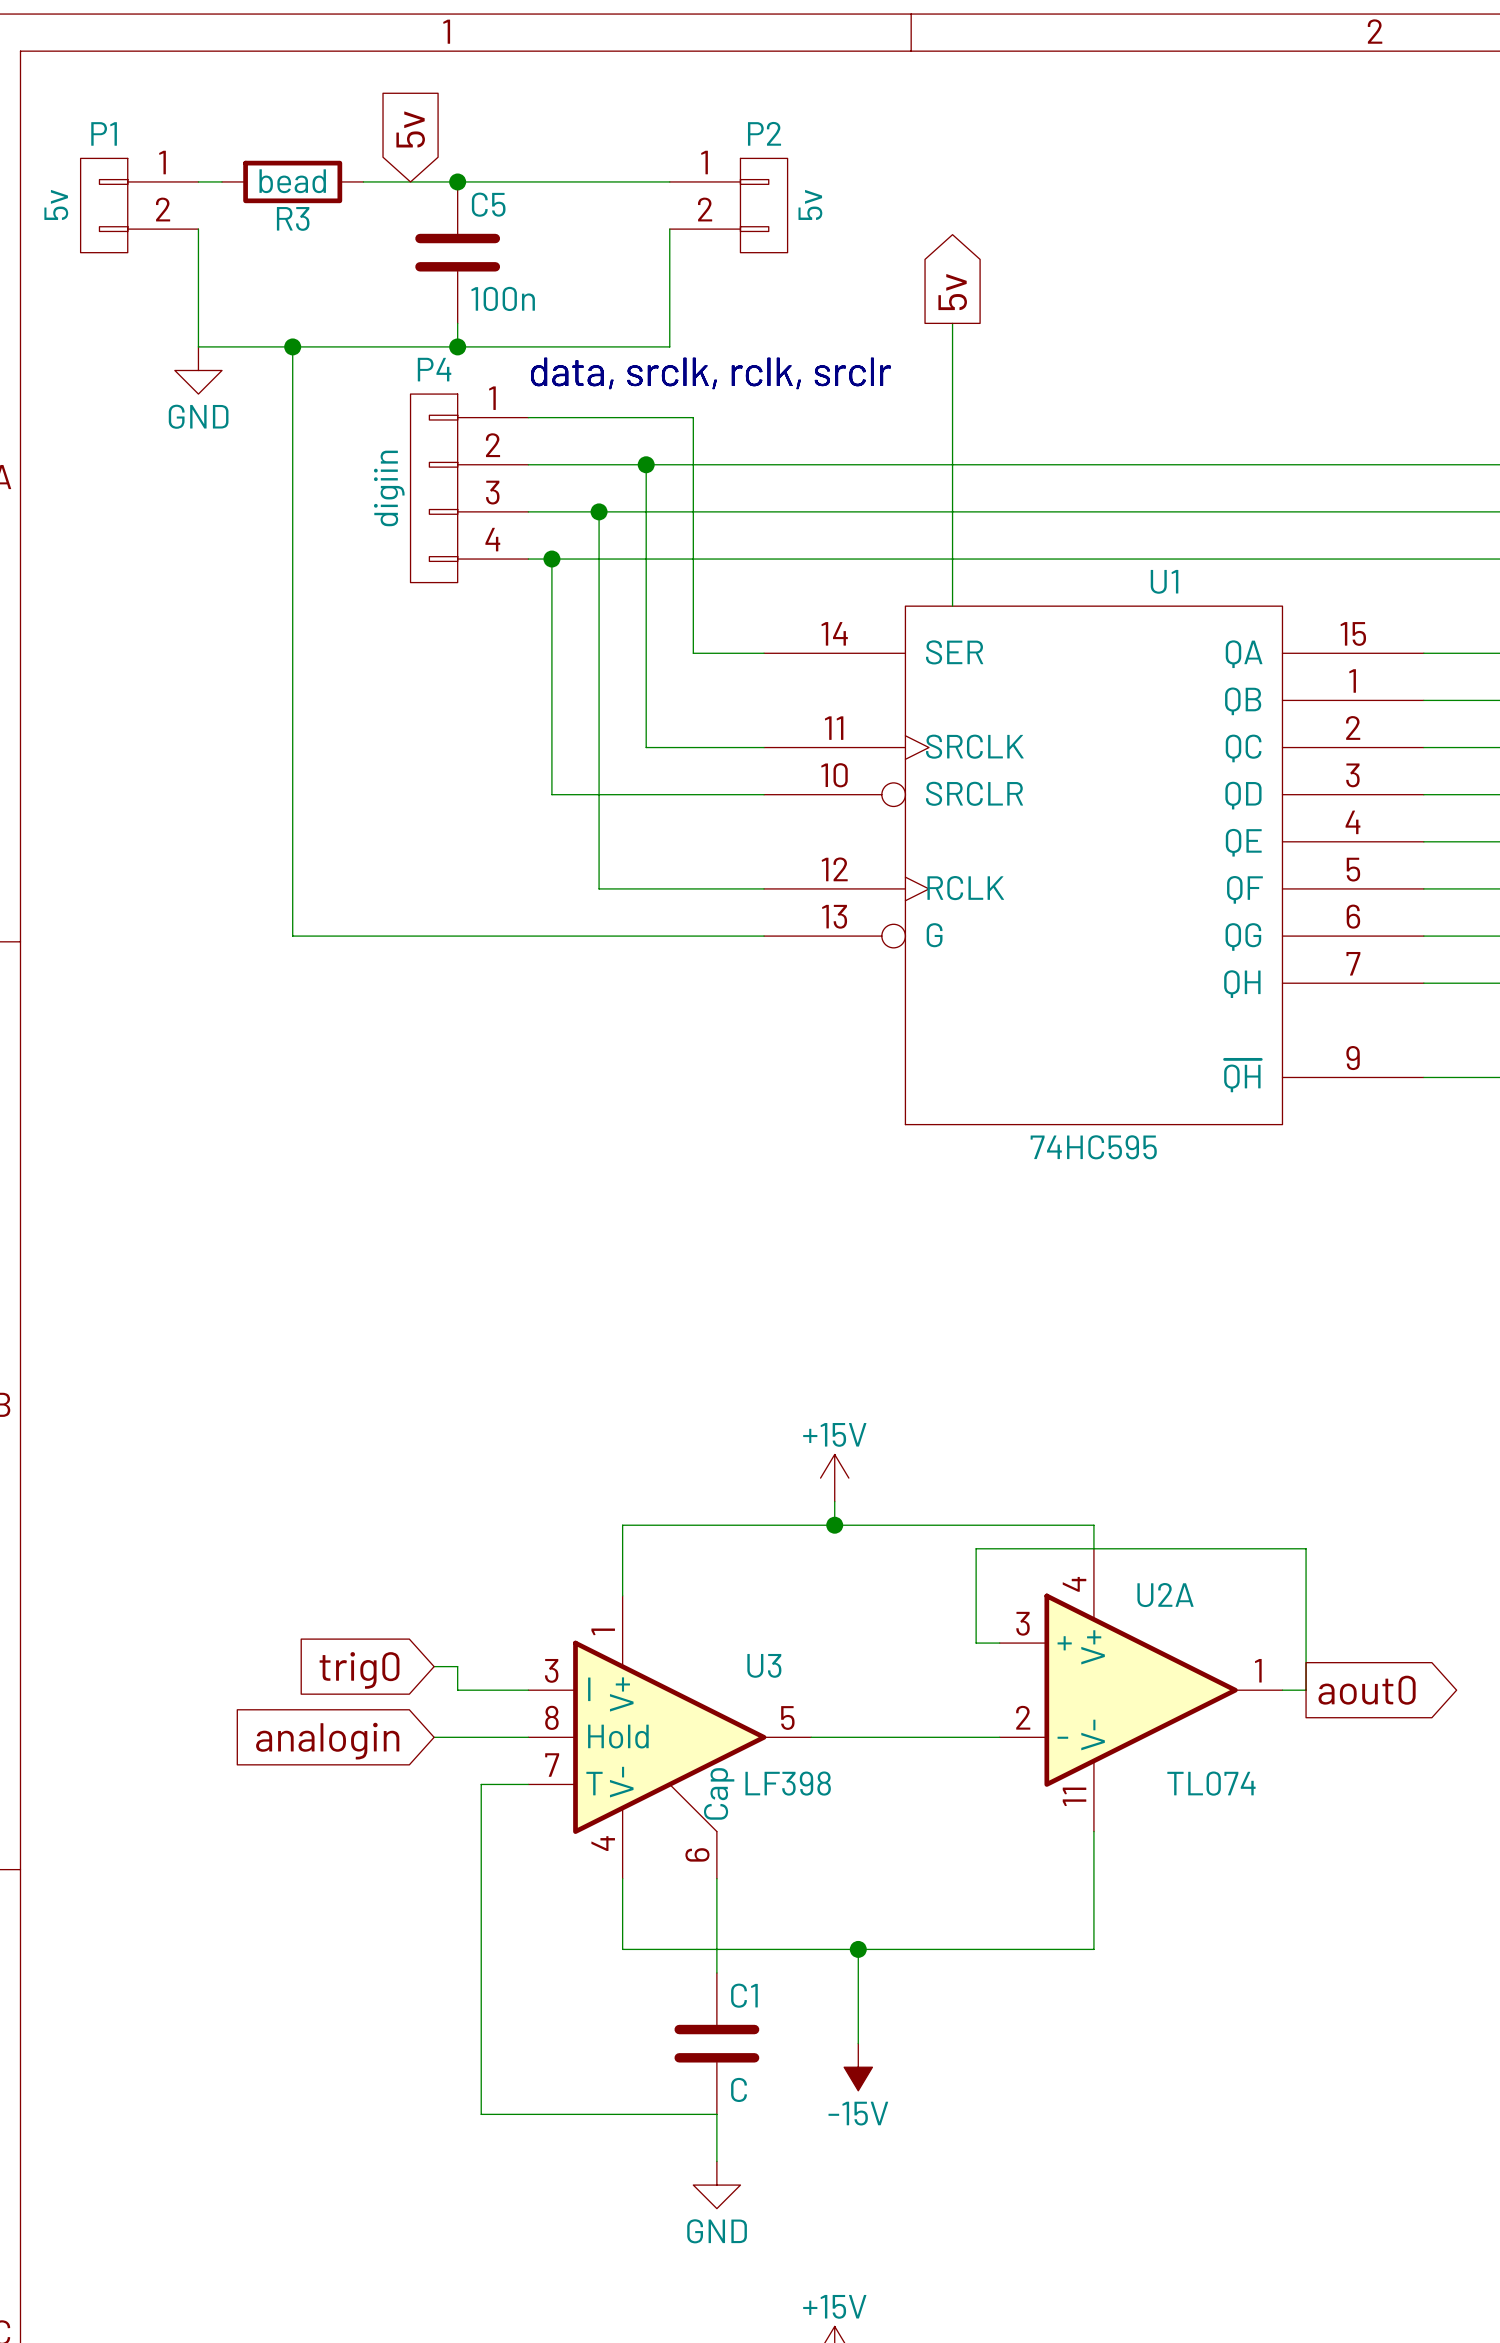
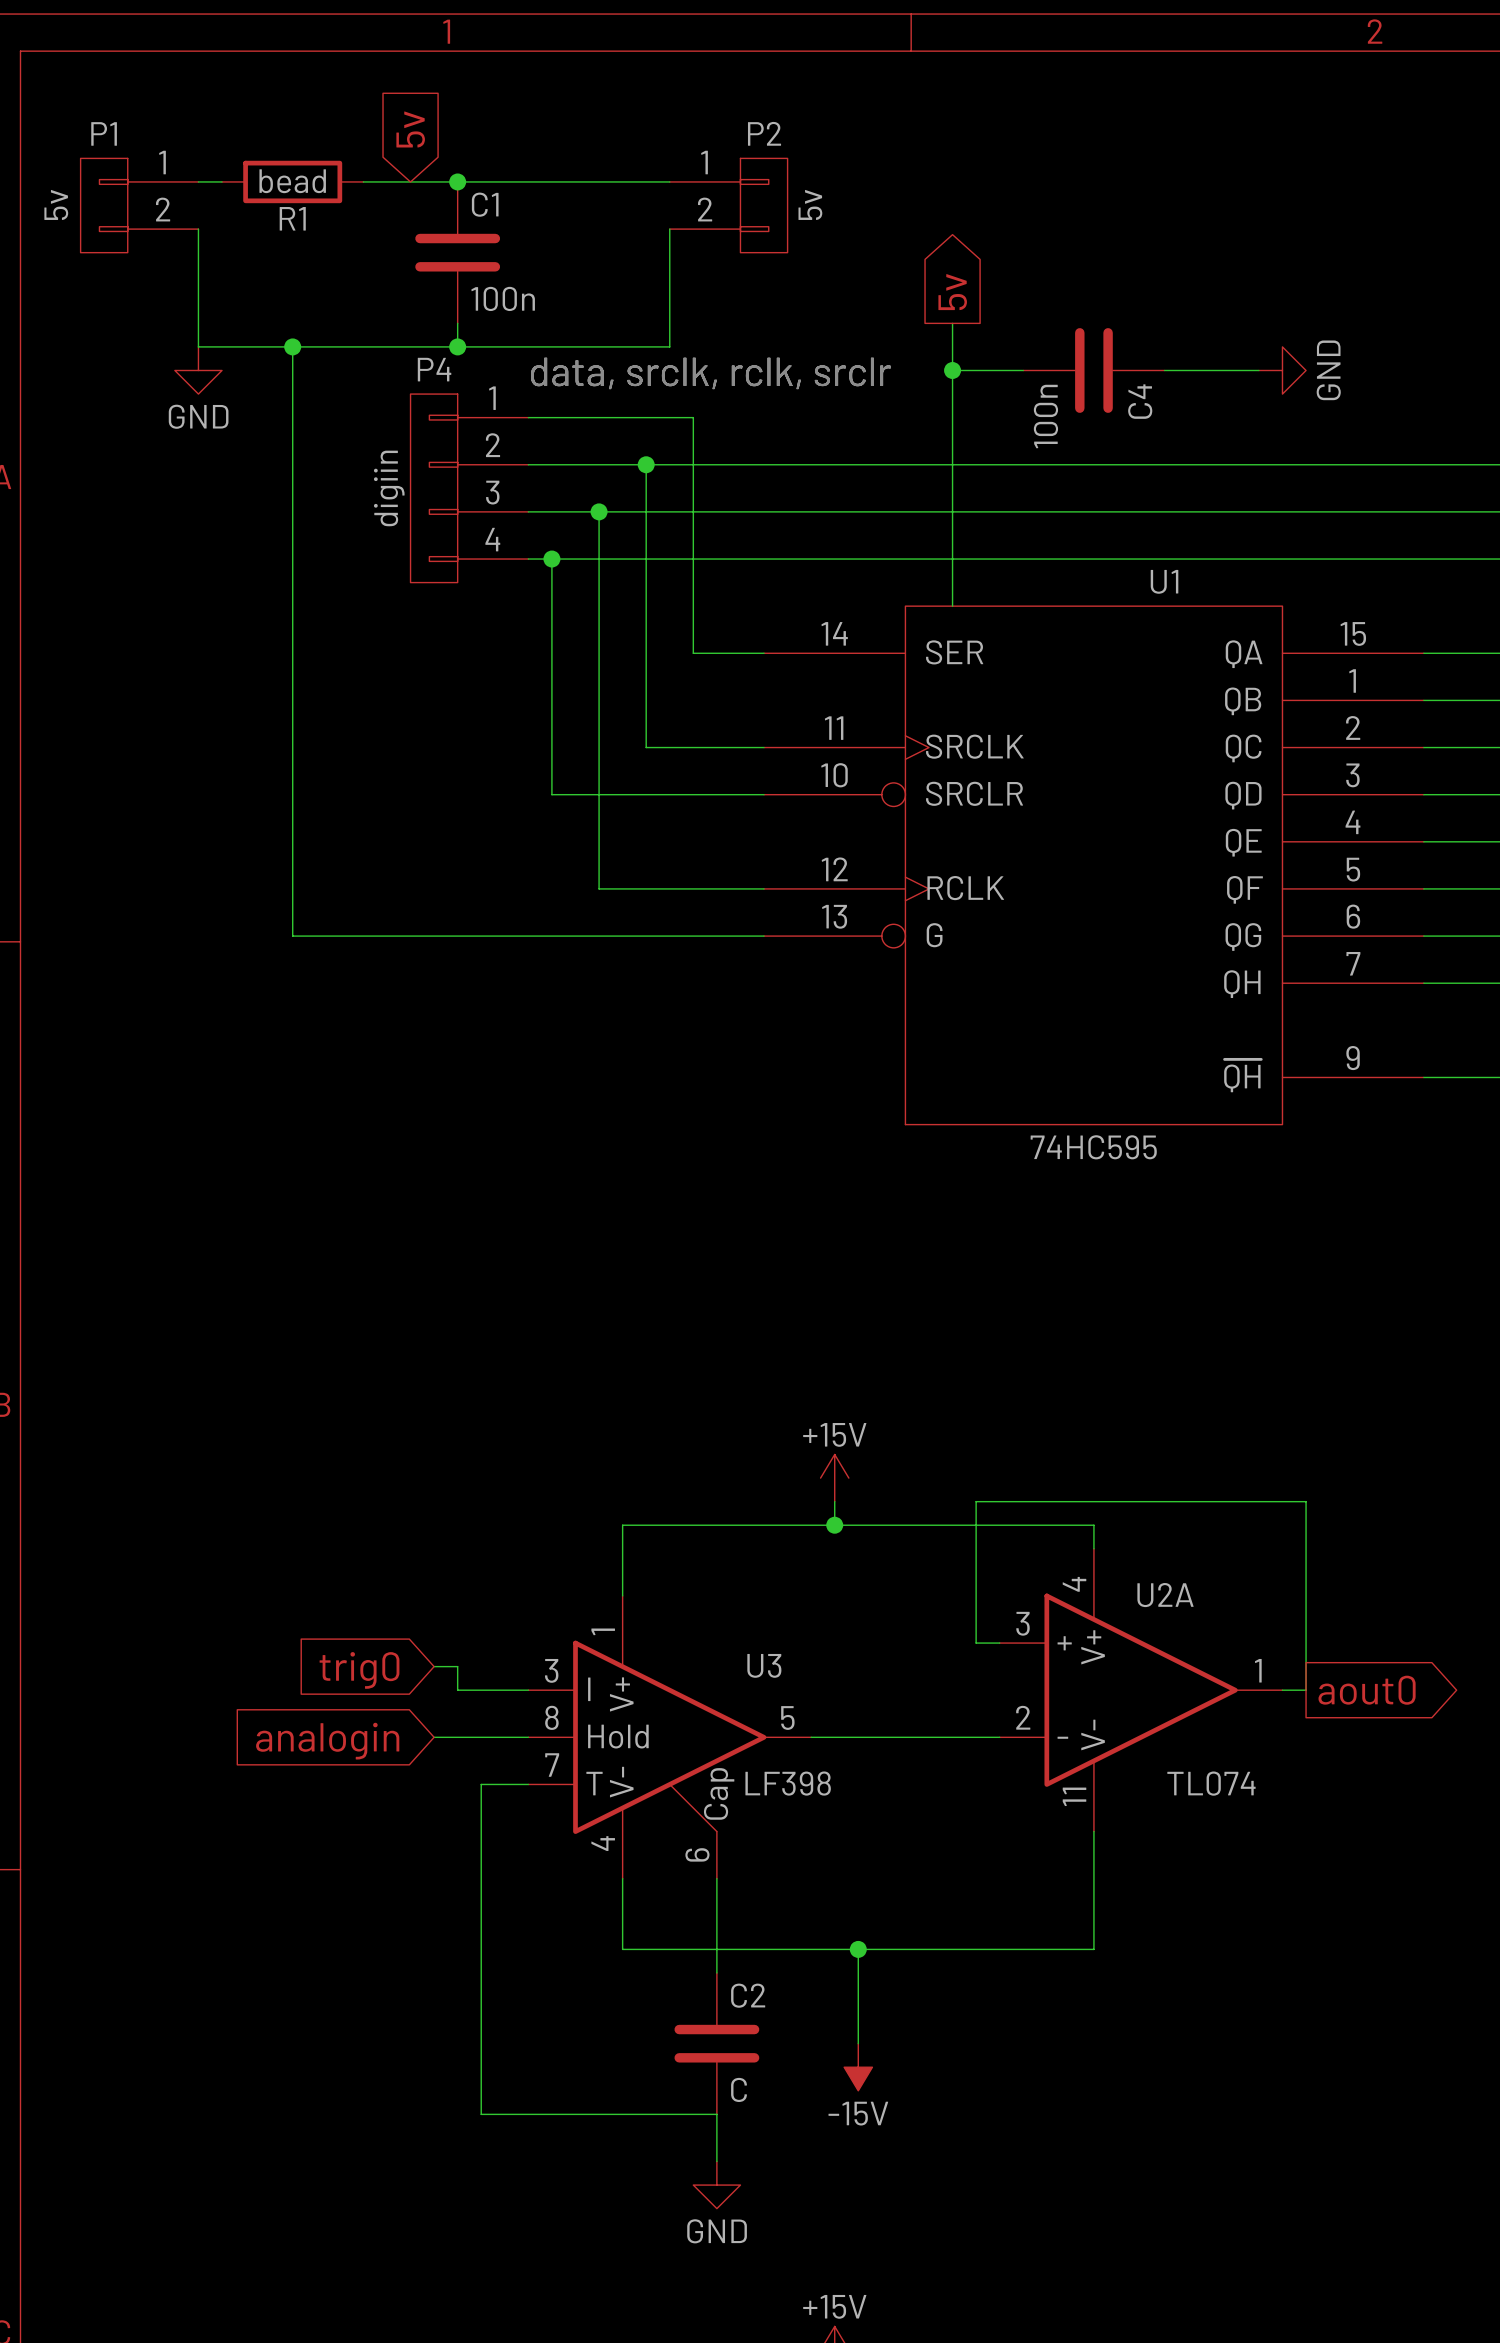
C5 name: C5 (488, 204) -> C1 (485, 204)
R3 name: R3 (293, 218) -> R1 (292, 218)
wire: none -> (952, 370) (1023, 370)
junction: none -> (952, 370)
C4: none -> 100n (1093, 370)
wire: none -> (1164, 370) (1258, 370)
power symbol: none -> GND (1282, 370)
wire: (976, 1548) (1306, 1548) -> (976, 1548) (976, 1501) (1306, 1501) (1306, 1548)
C1 name: C1 (744, 1995) -> C2 (748, 1995)

